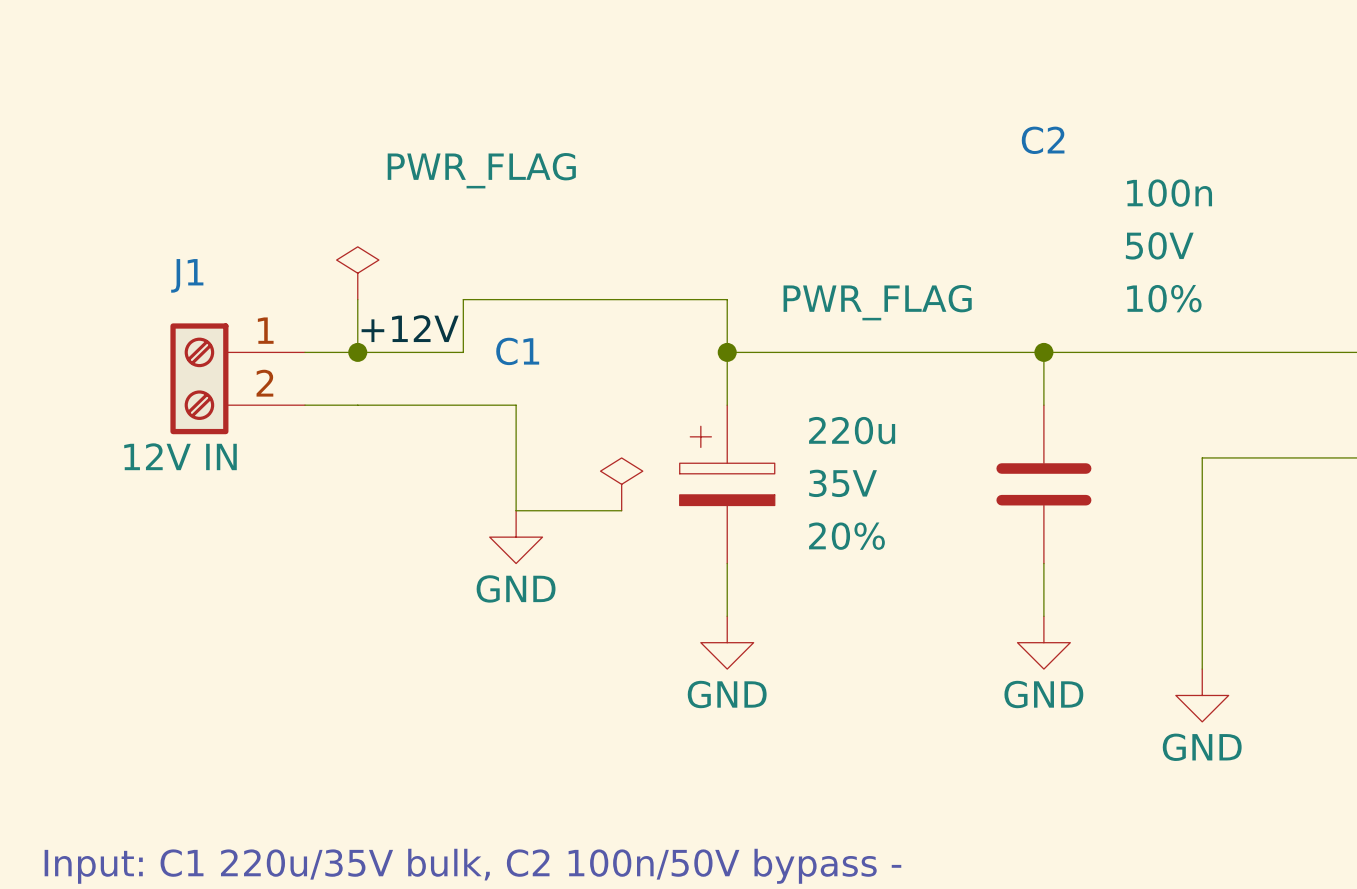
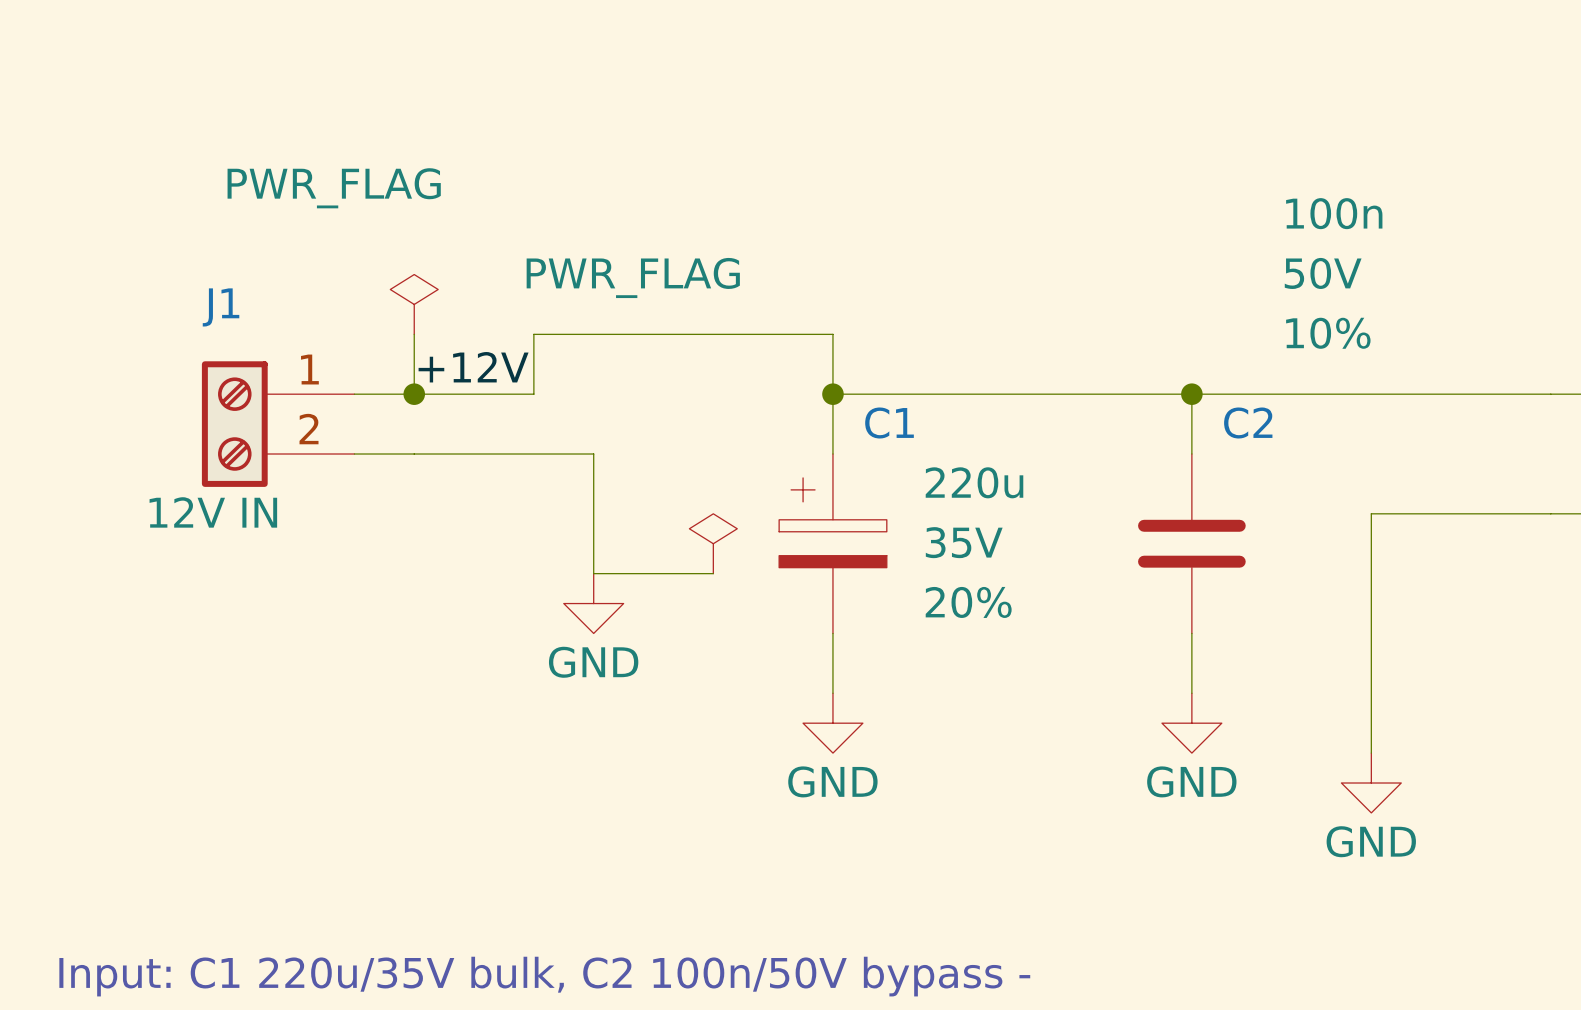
C2 name position: C2 (1043, 140) -> C2 (1248, 423)
power symbol text position: PWR_FLAG (481, 170) -> PWR_FLAG (334, 188)
power symbol text position: PWR_FLAG (877, 302) -> PWR_FLAG (633, 278)
C1 name position: C1 (517, 351) -> C1 (889, 423)

